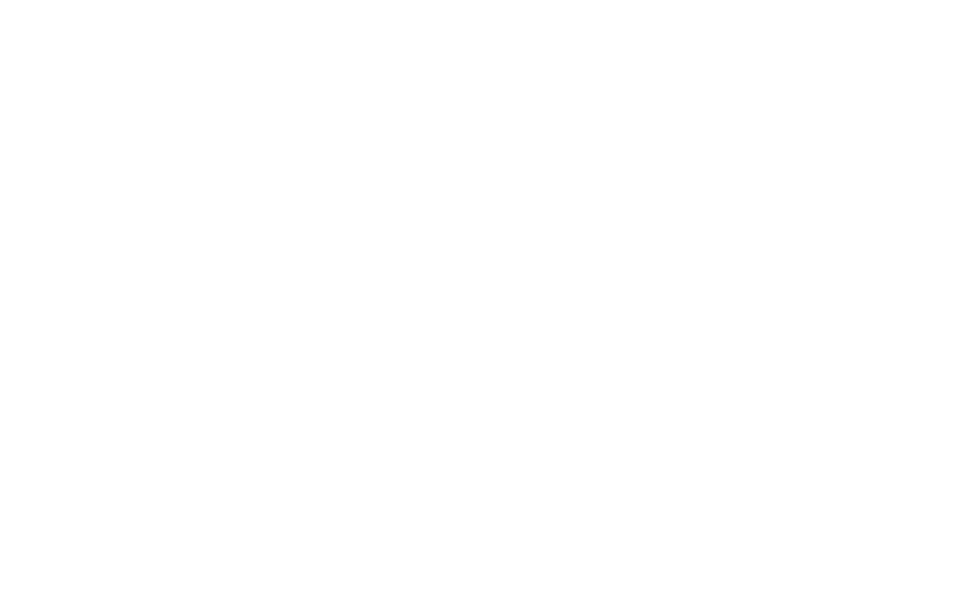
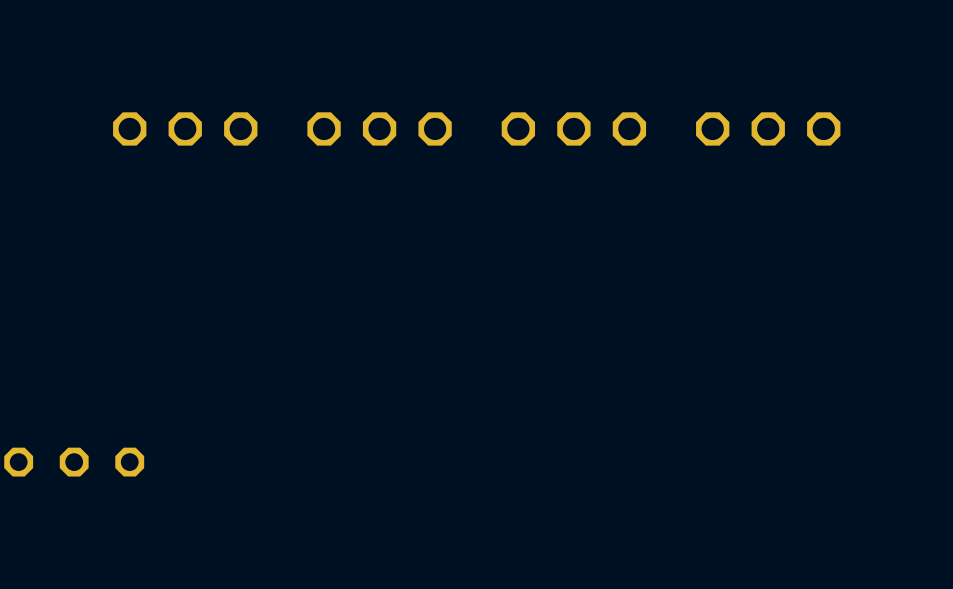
part: none -> (185, 128)
part: none -> (379, 128)
part: none -> (573, 128)
part: none -> (768, 128)
part: none -> (74, 462)

